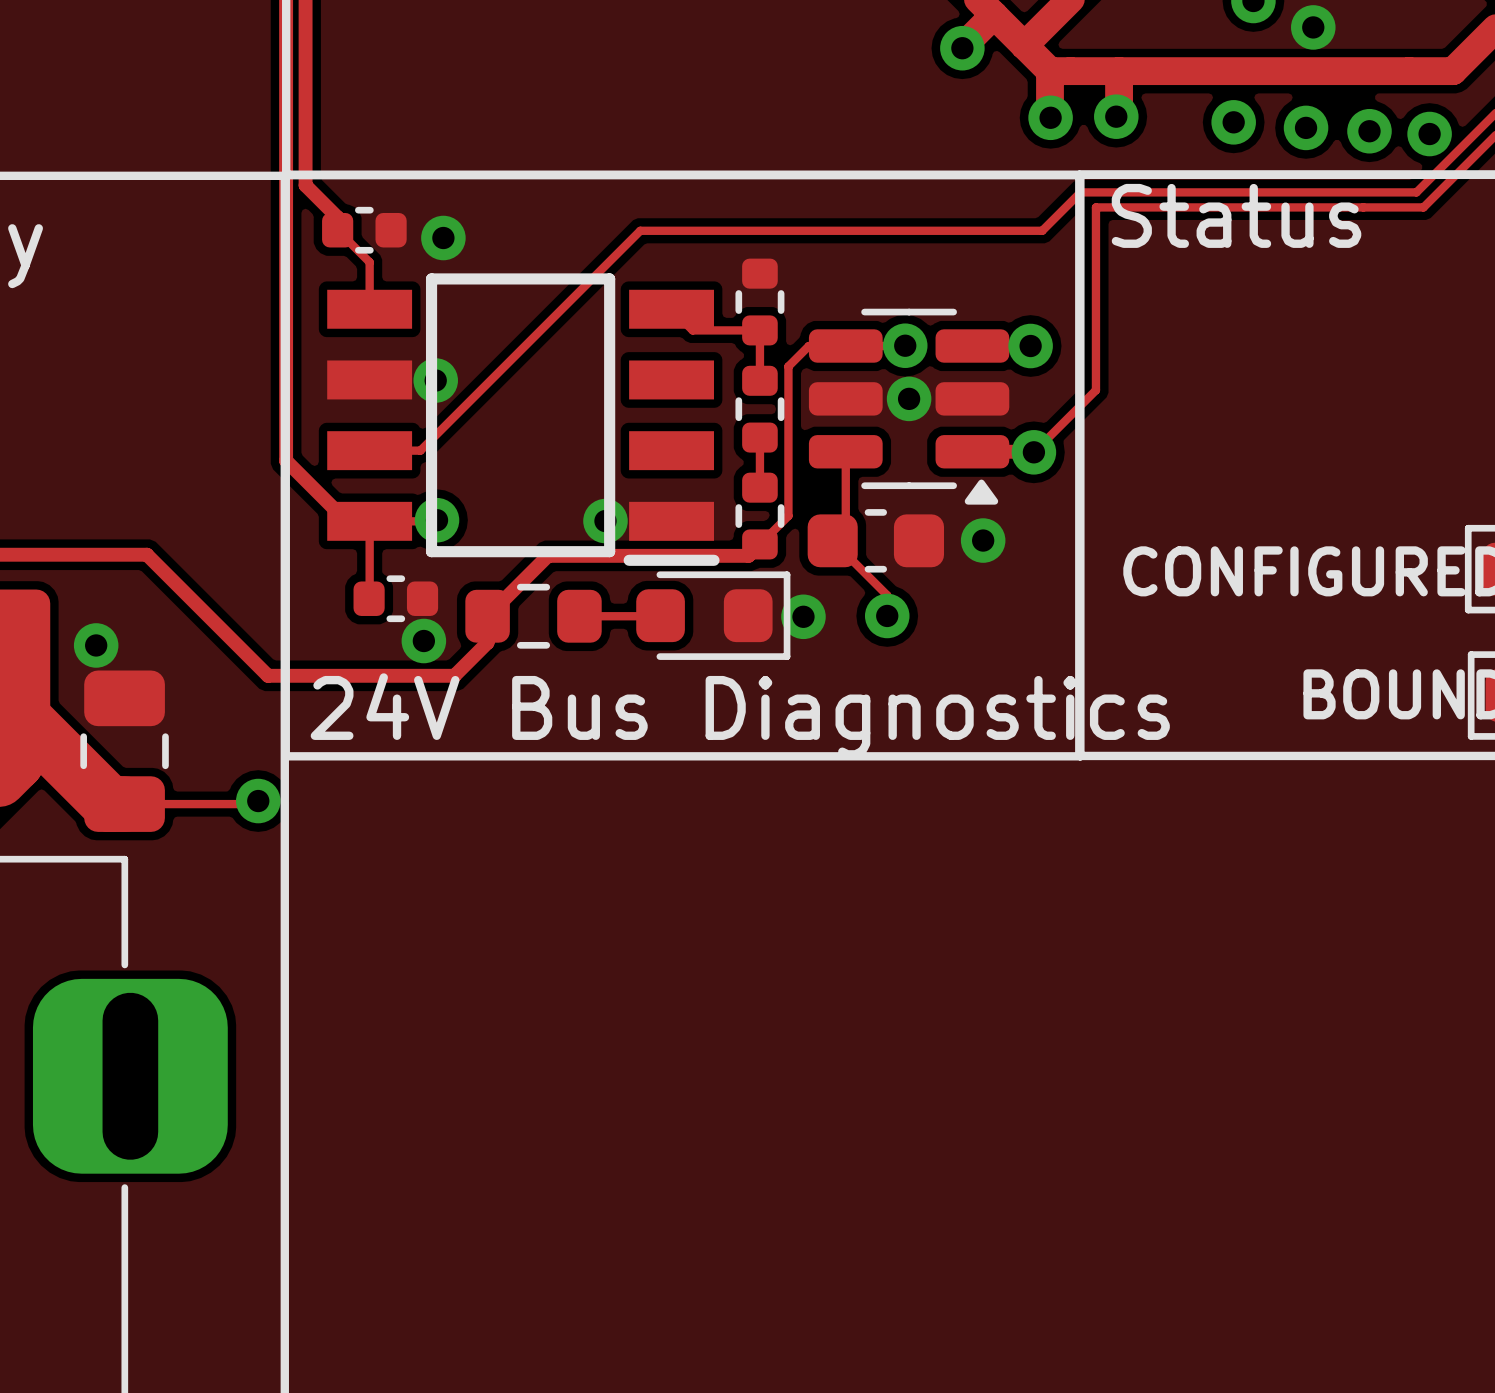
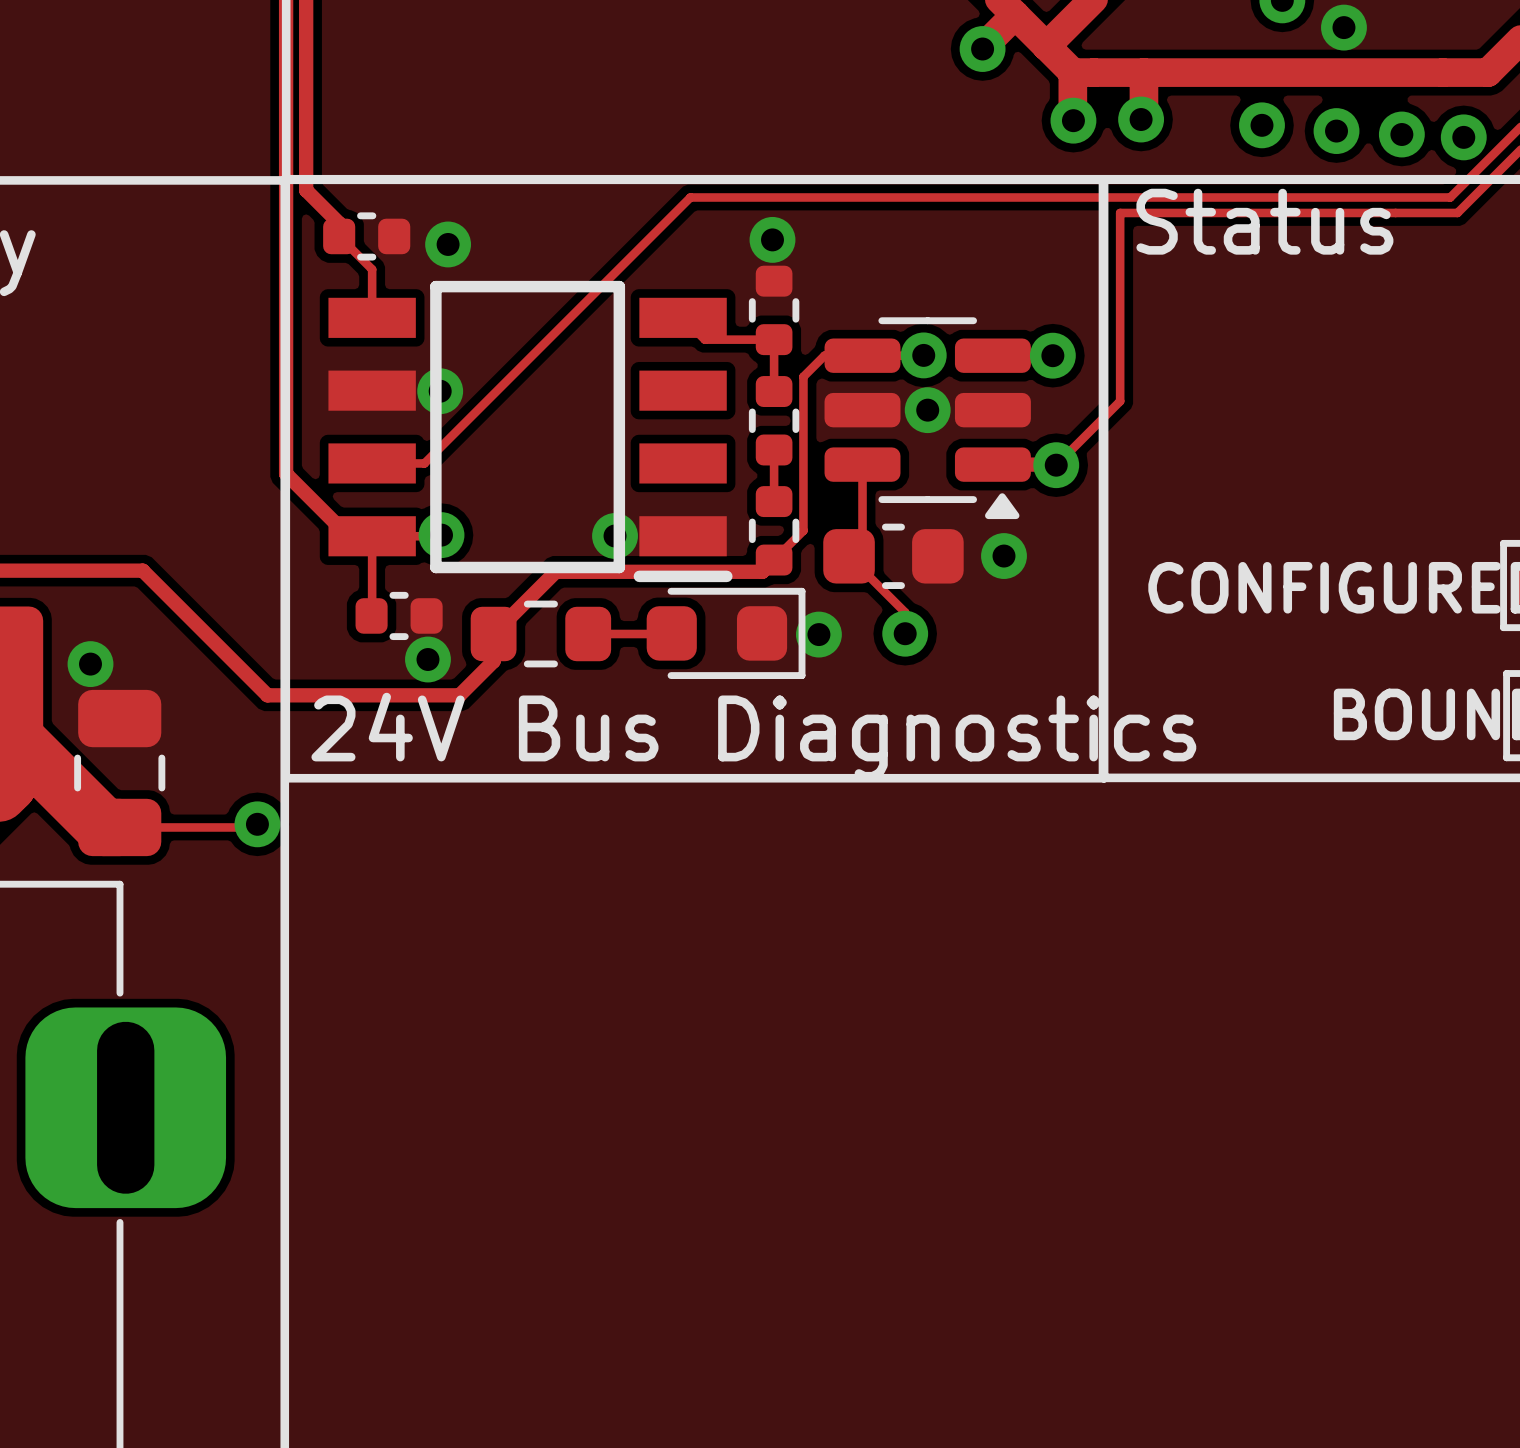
track: (1080, 192) (1042, 230) (640, 230) -> (1104, 197) (690, 197) (650, 237)
via: none -> (772, 239)

